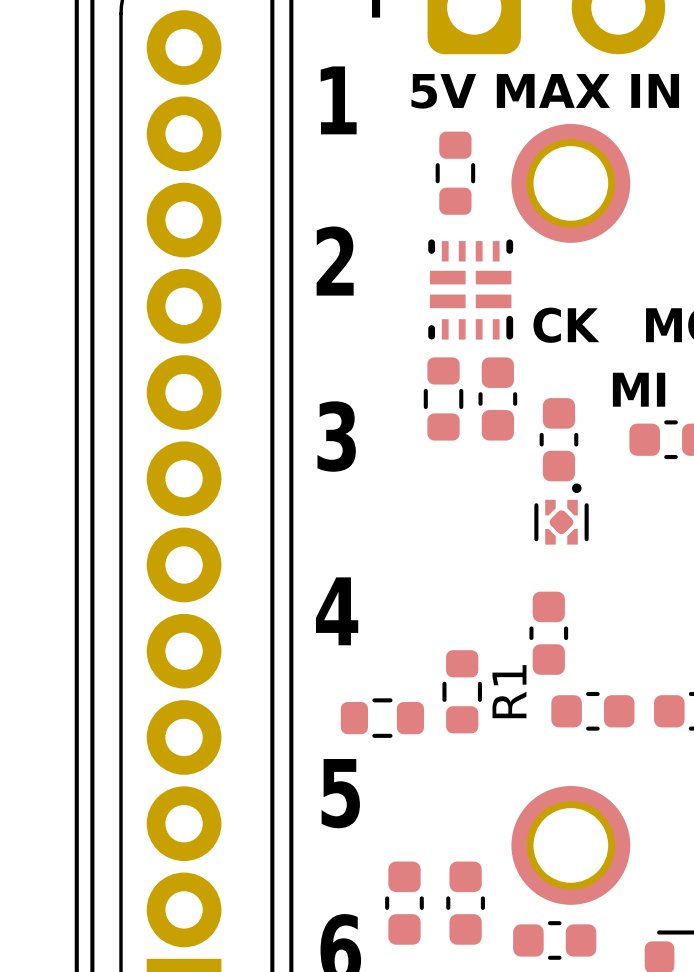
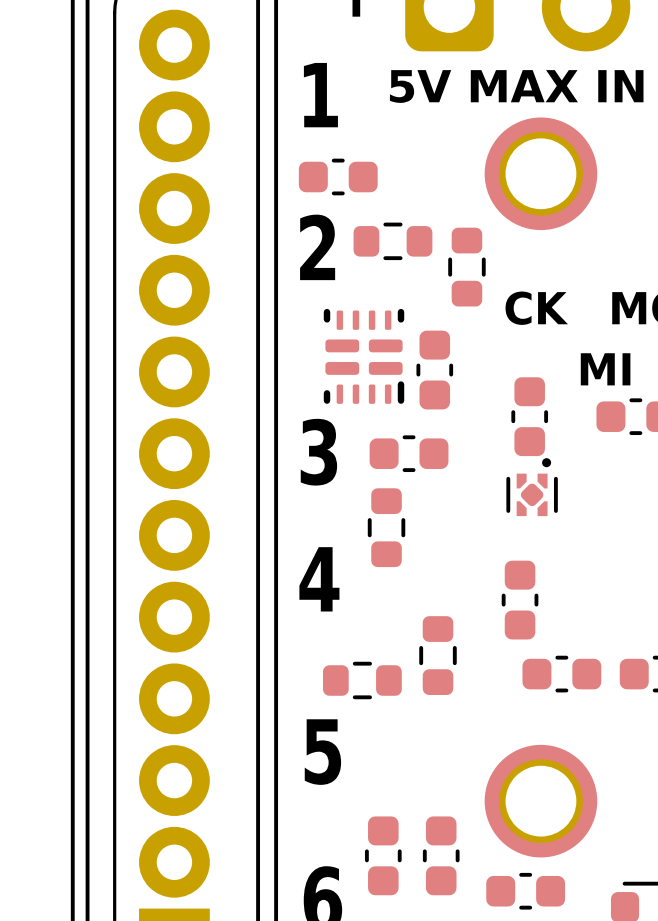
part rotation: 0° (455, 173) -> 90° clockwise (392, 241)
part position: (455, 173) -> (392, 241)
part: none -> (338, 177)
part footprint: [428, 239, 514, 340] -> [448, 227, 486, 307]
part footprint: [423, 357, 464, 441] -> [416, 330, 454, 410]
part: none -> (364, 356)
part rotation: 0° (497, 398) -> 90° clockwise (409, 453)
part position: (497, 398) -> (409, 453)
text position: 3 (336, 436) -> 3 (318, 452)
part: none -> (386, 527)
R1 name: R1 (509, 691) -> none

